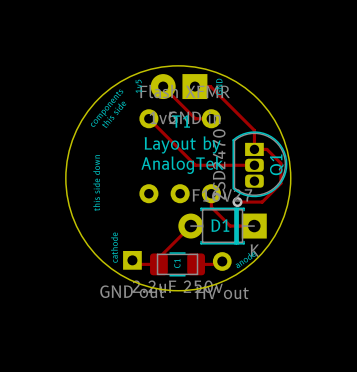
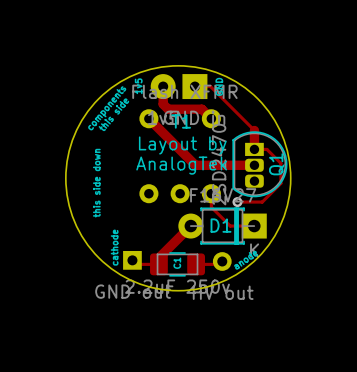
track: (163, 86) (195, 118) (211, 118) -> (163, 86) (163, 104) (168, 109) (201, 109) (211, 118)
track width: thin (148, 118) (195, 165) (254, 165) -> thick (148, 118) (195, 165) (254, 165)
track width: thin (254, 130) (254, 149) -> thick (254, 130) (254, 149)
track width: thin (190, 226) (158, 257) (158, 264) -> thick (190, 226) (158, 257) (158, 264)

